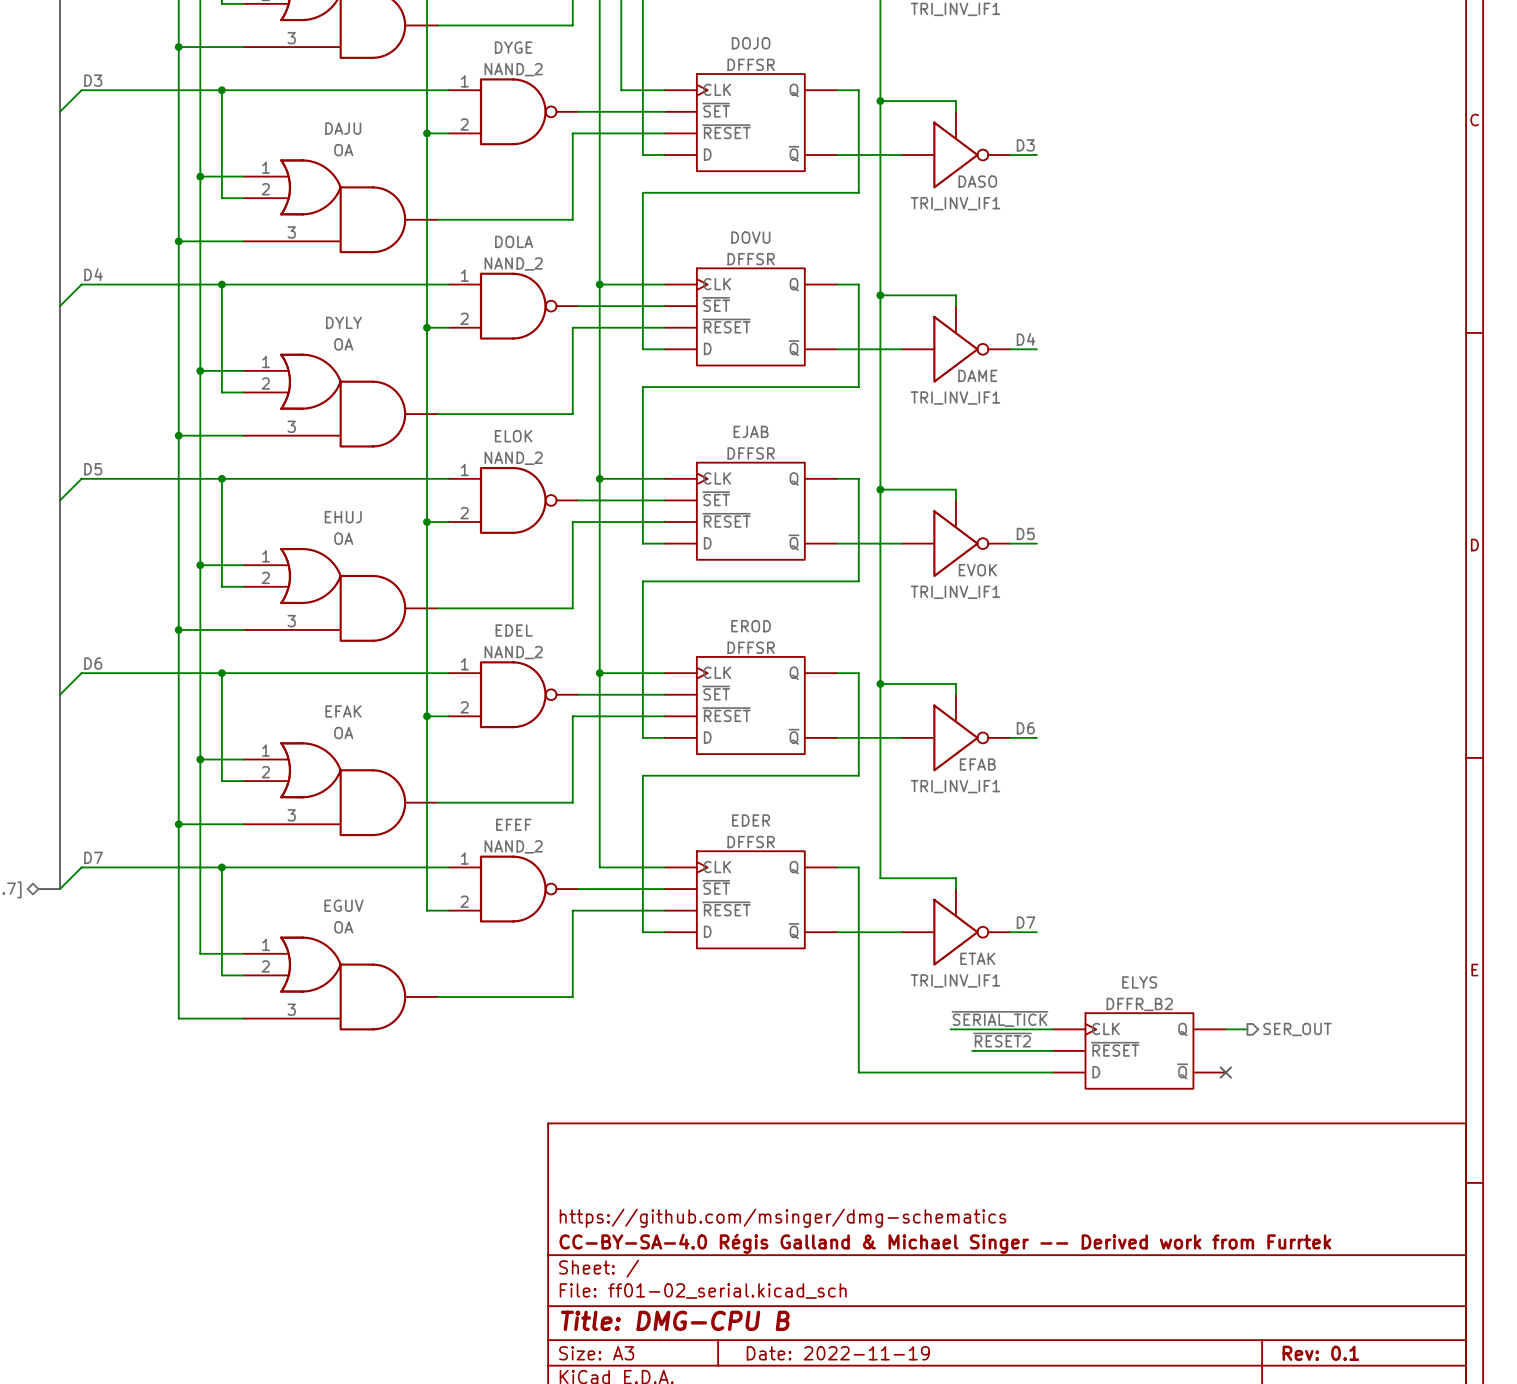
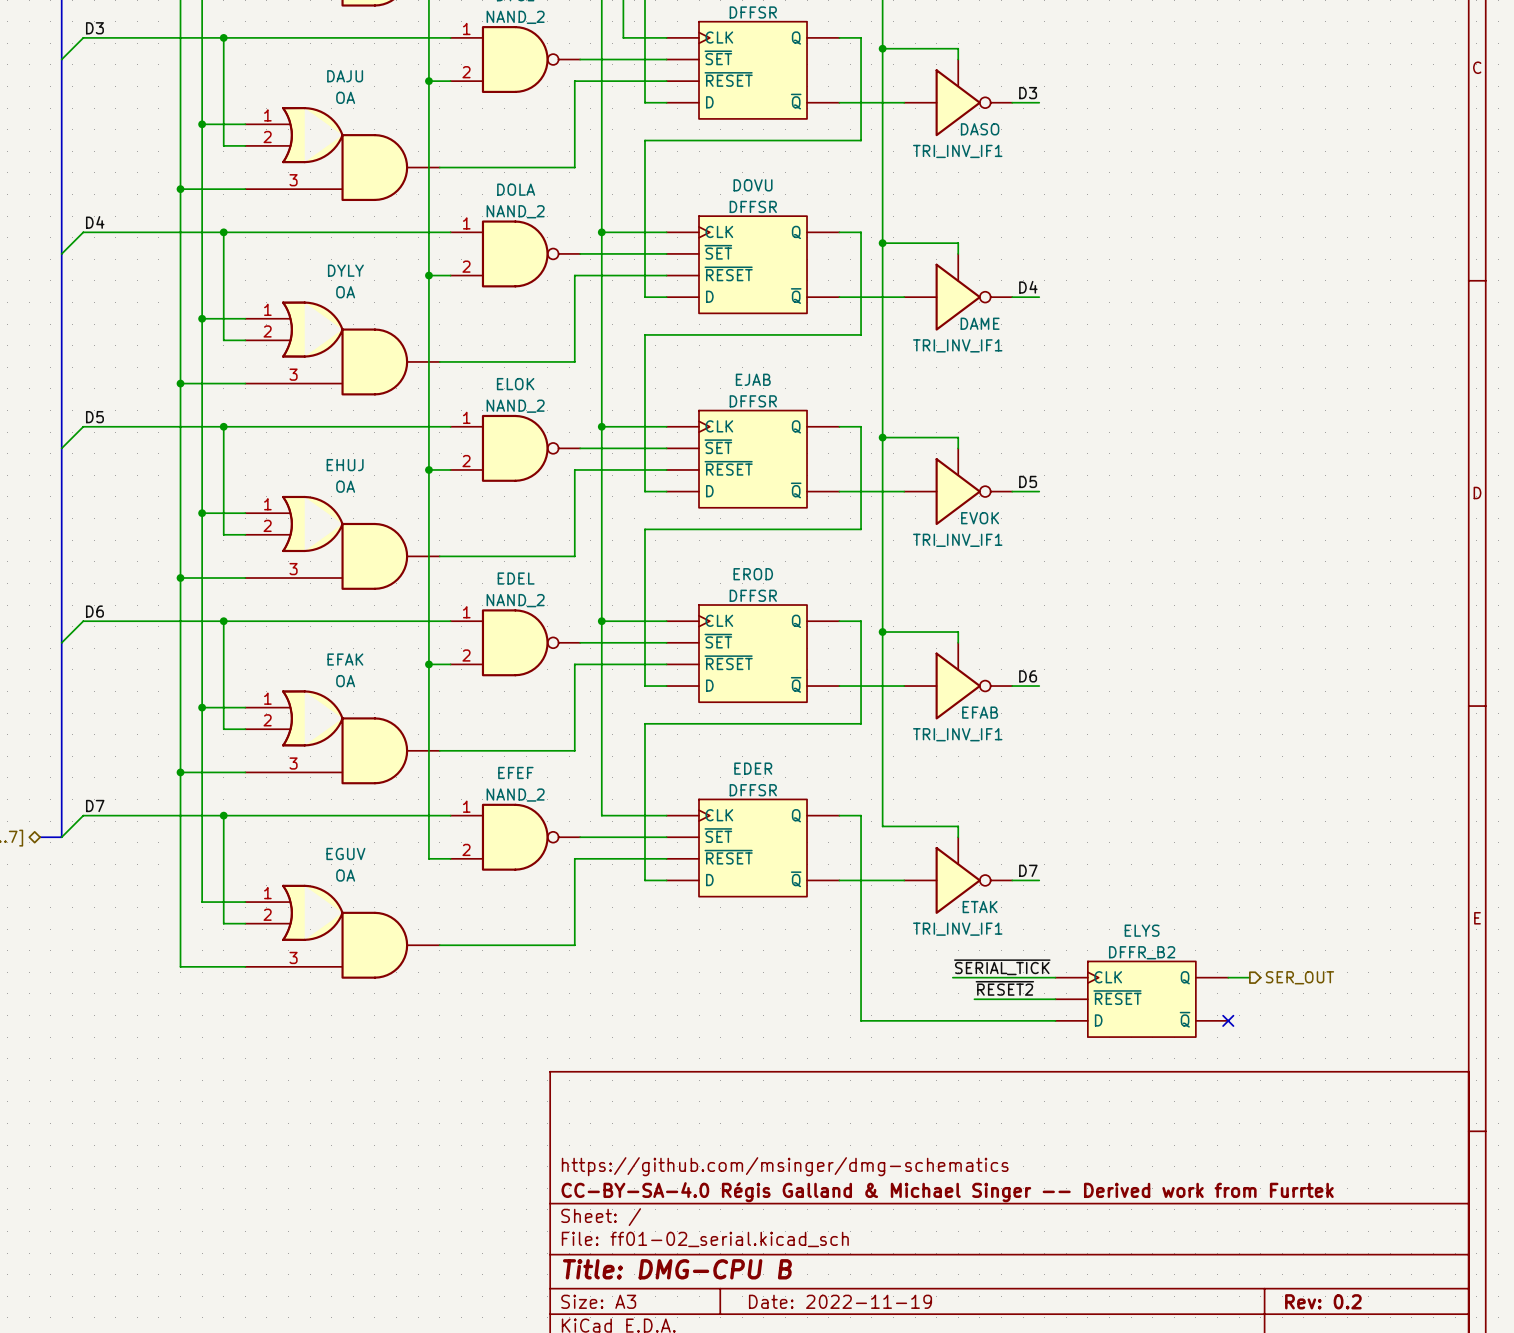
title block: Rev: 0.1 (1320, 1353) -> Rev: 0.2 (1323, 1301)

